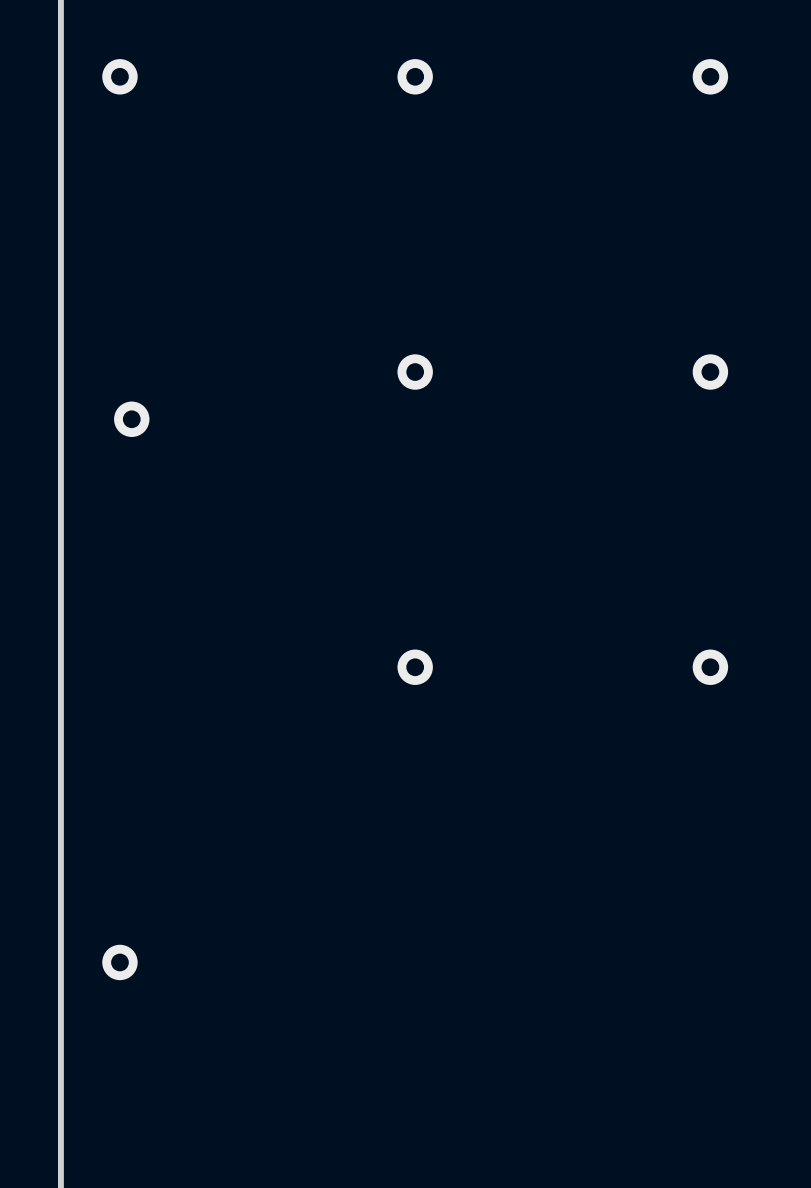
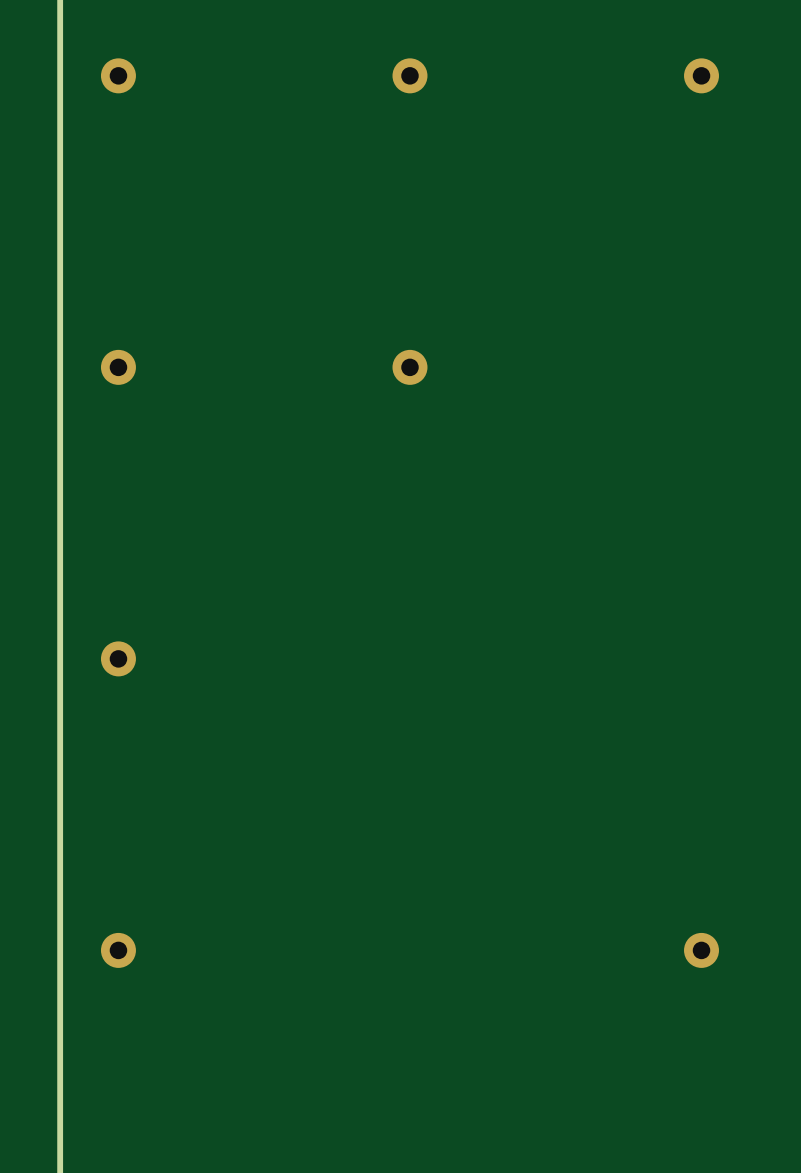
via: (710, 372) -> none
via position: (131, 419) -> (118, 367)
via: none -> (118, 658)
via: (415, 667) -> none
via: (710, 667) -> none
via: none -> (701, 950)

